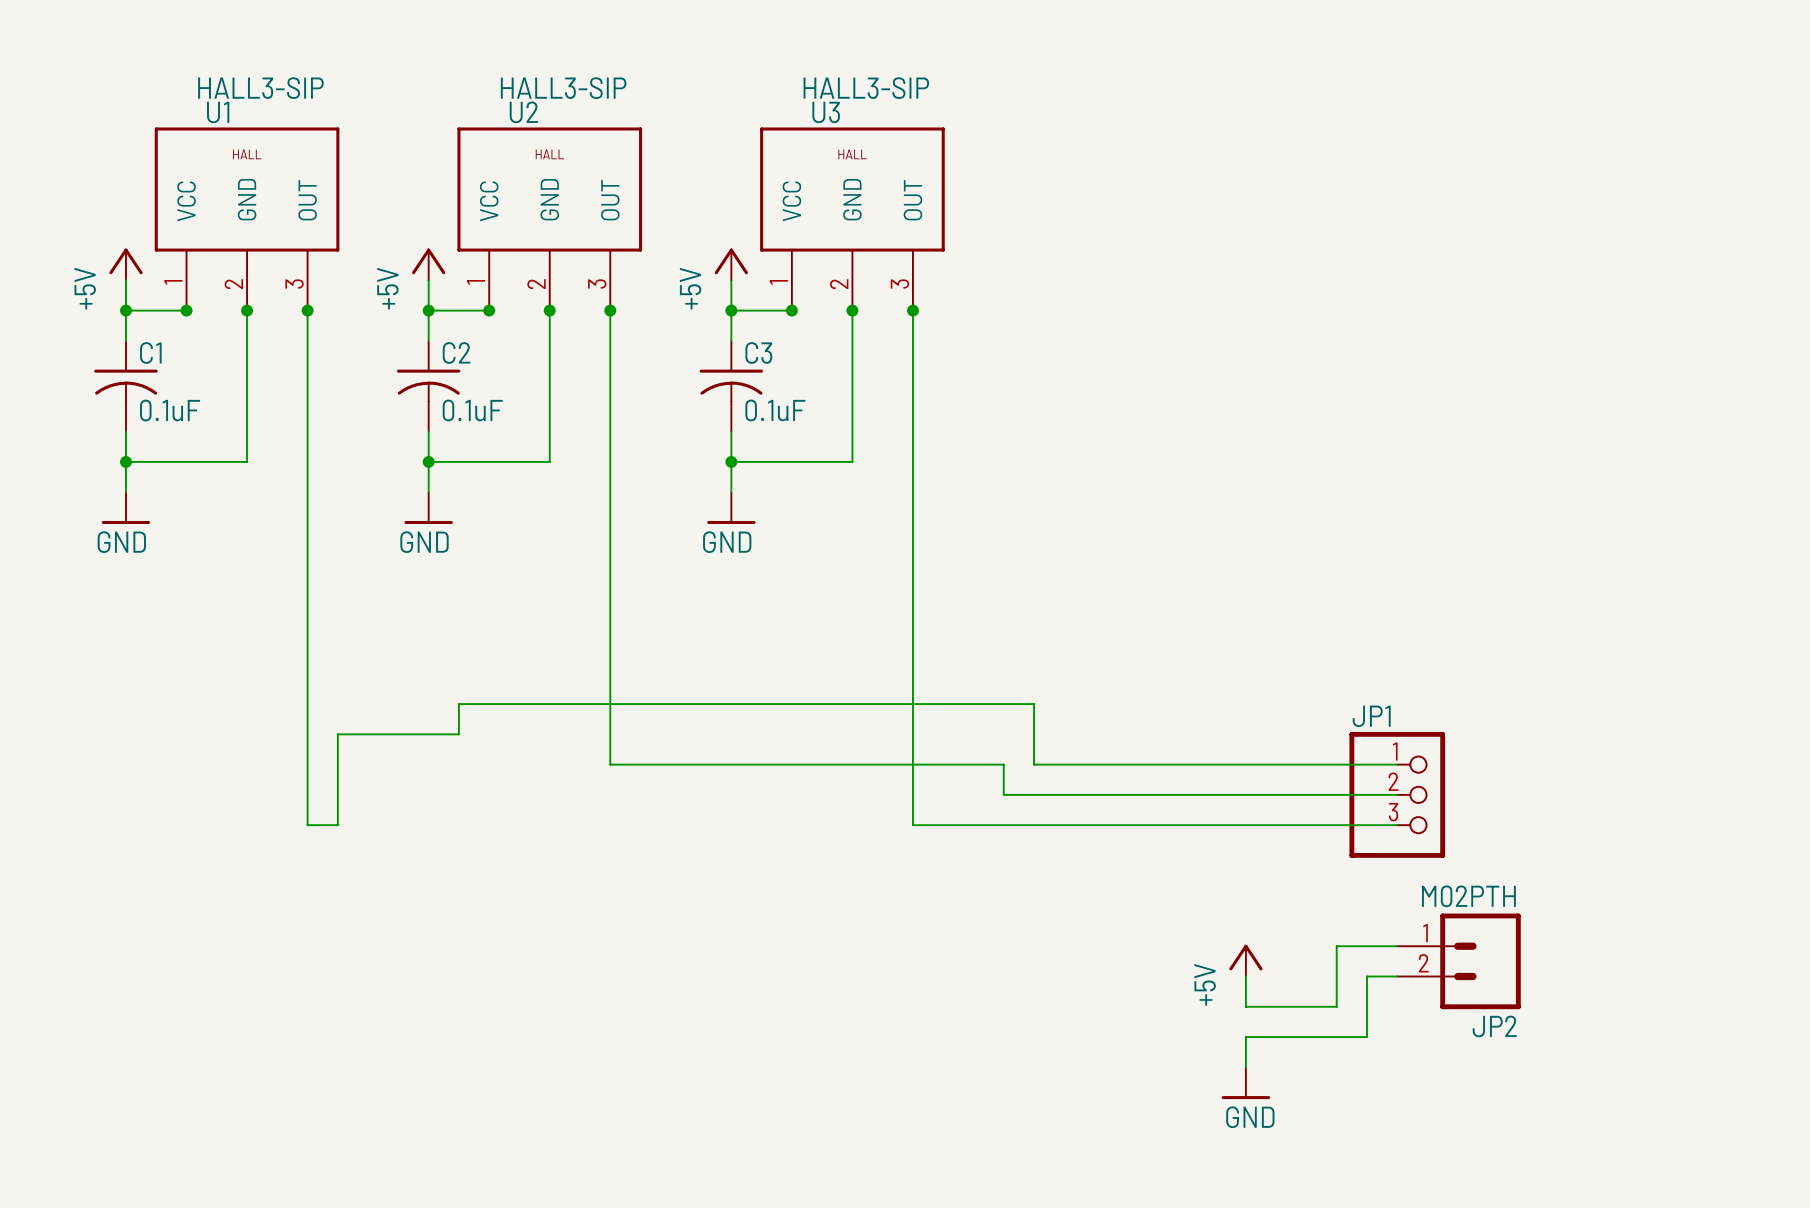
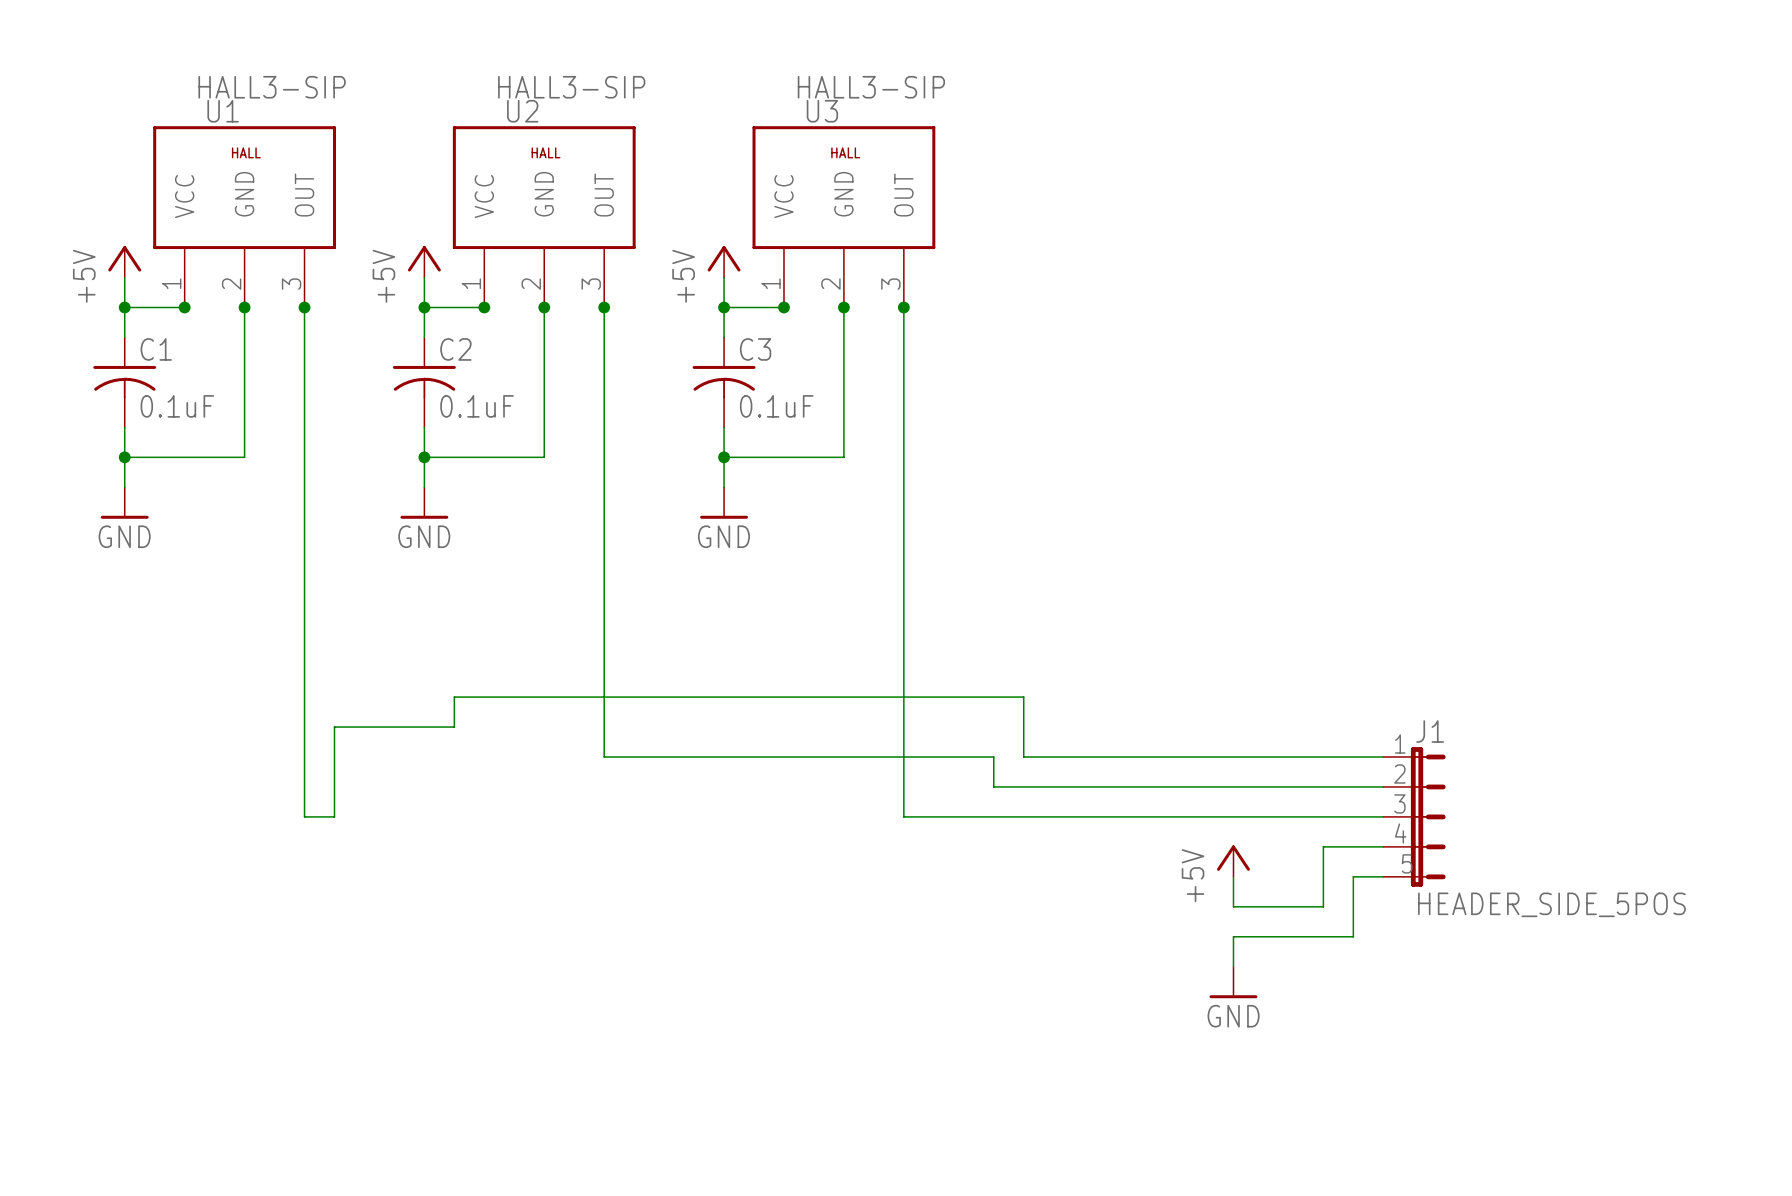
JP1: (1397, 794) -> none
J1: none -> HEADER_SIDE_5POS (1414, 816)
wire: none -> (1383, 846) (1323, 846) (1323, 906) (1233, 906) (1233, 876)
wire: (1336, 946) (1336, 1006) (1245, 1006) (1245, 976) -> (1323, 936) (1233, 936) (1233, 966)
wire: (1366, 946) (1397, 946) -> (1353, 936) (1353, 876) (1383, 876)
power symbol position: +5V (1245, 960) -> +5V (1233, 861)
JP2: M02PTH (1459, 961) -> none
wire: (1397, 976) (1366, 976) (1366, 1037) (1245, 1037) (1245, 1067) -> none
power symbol position: GND (1245, 1083) -> GND (1233, 982)

